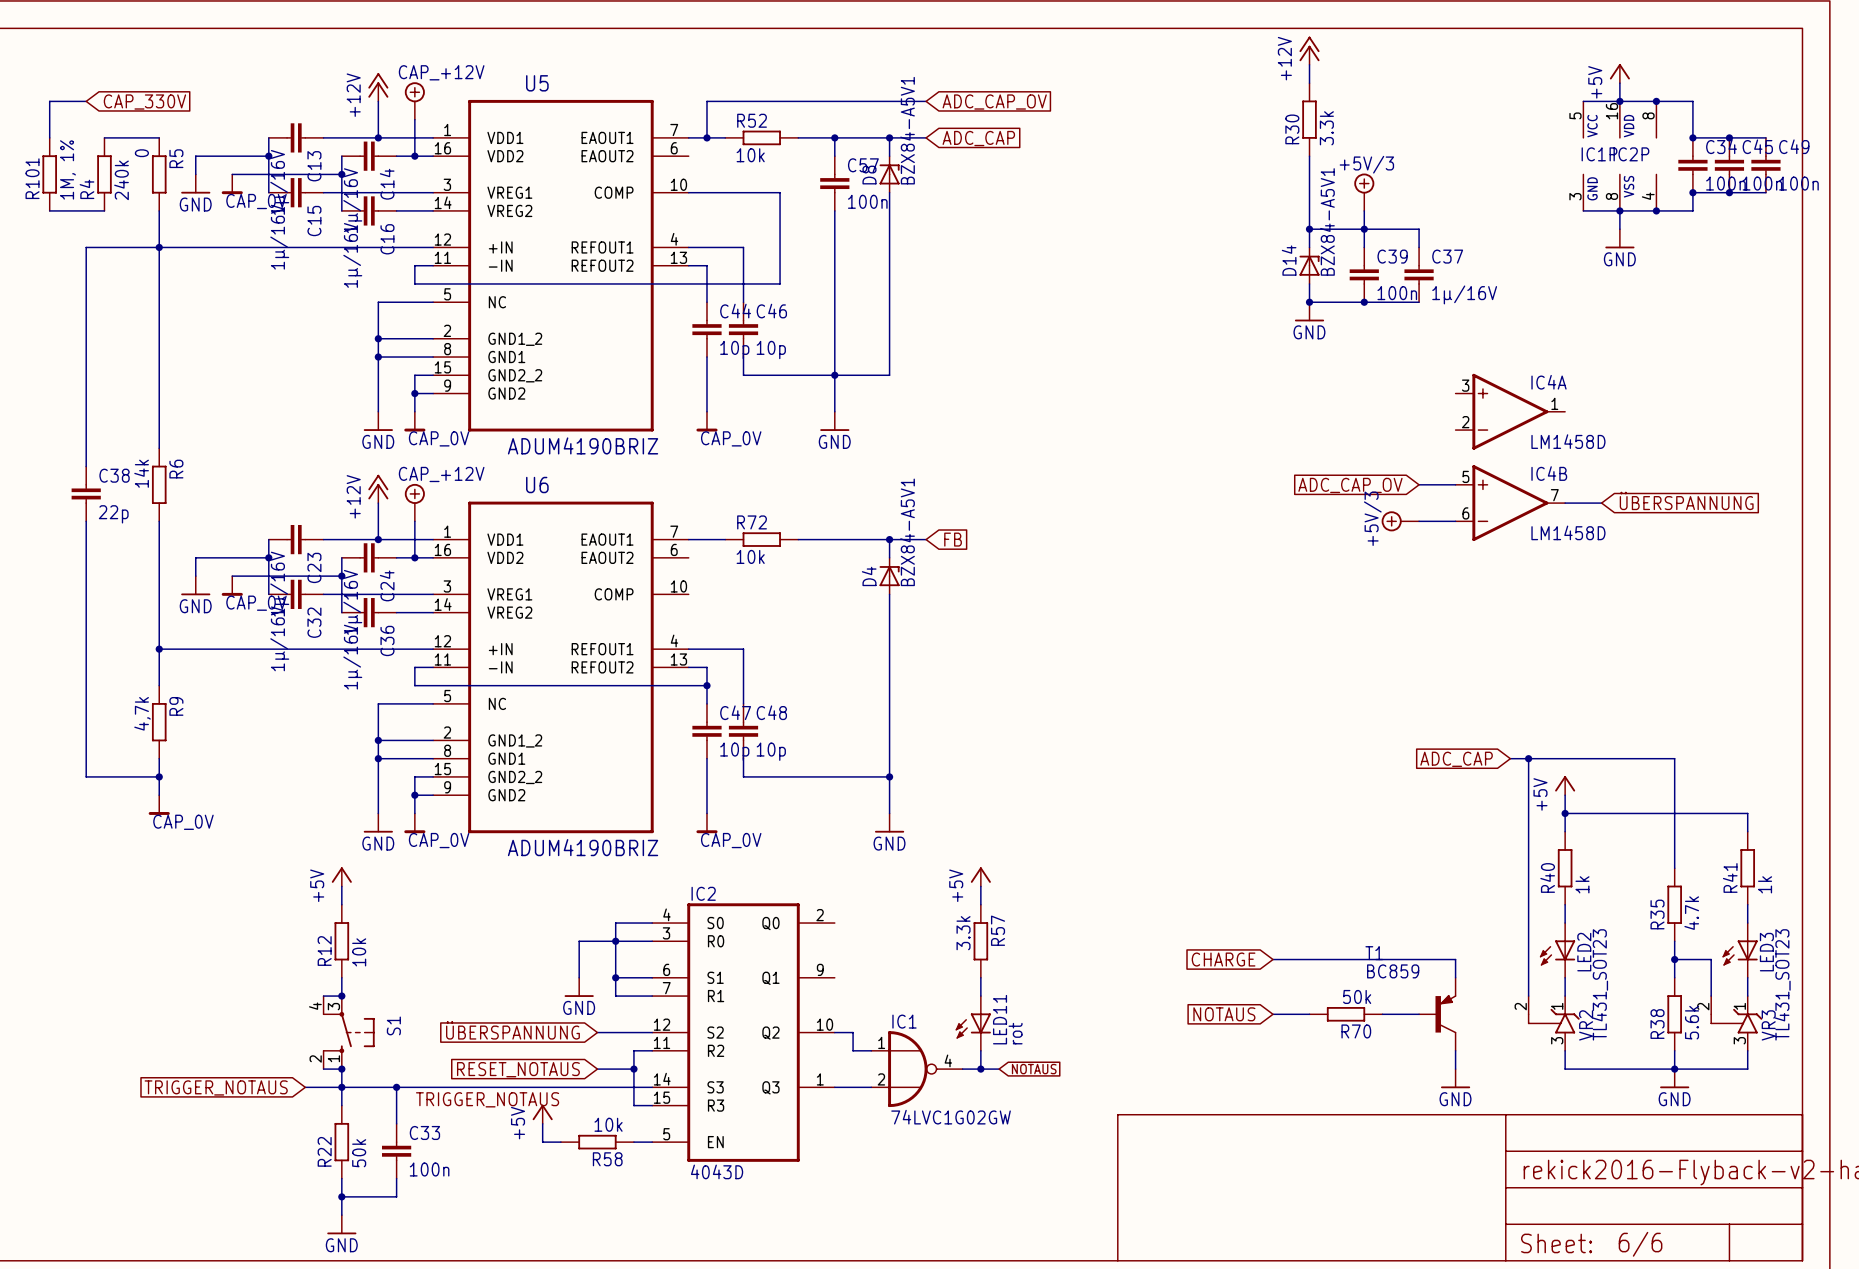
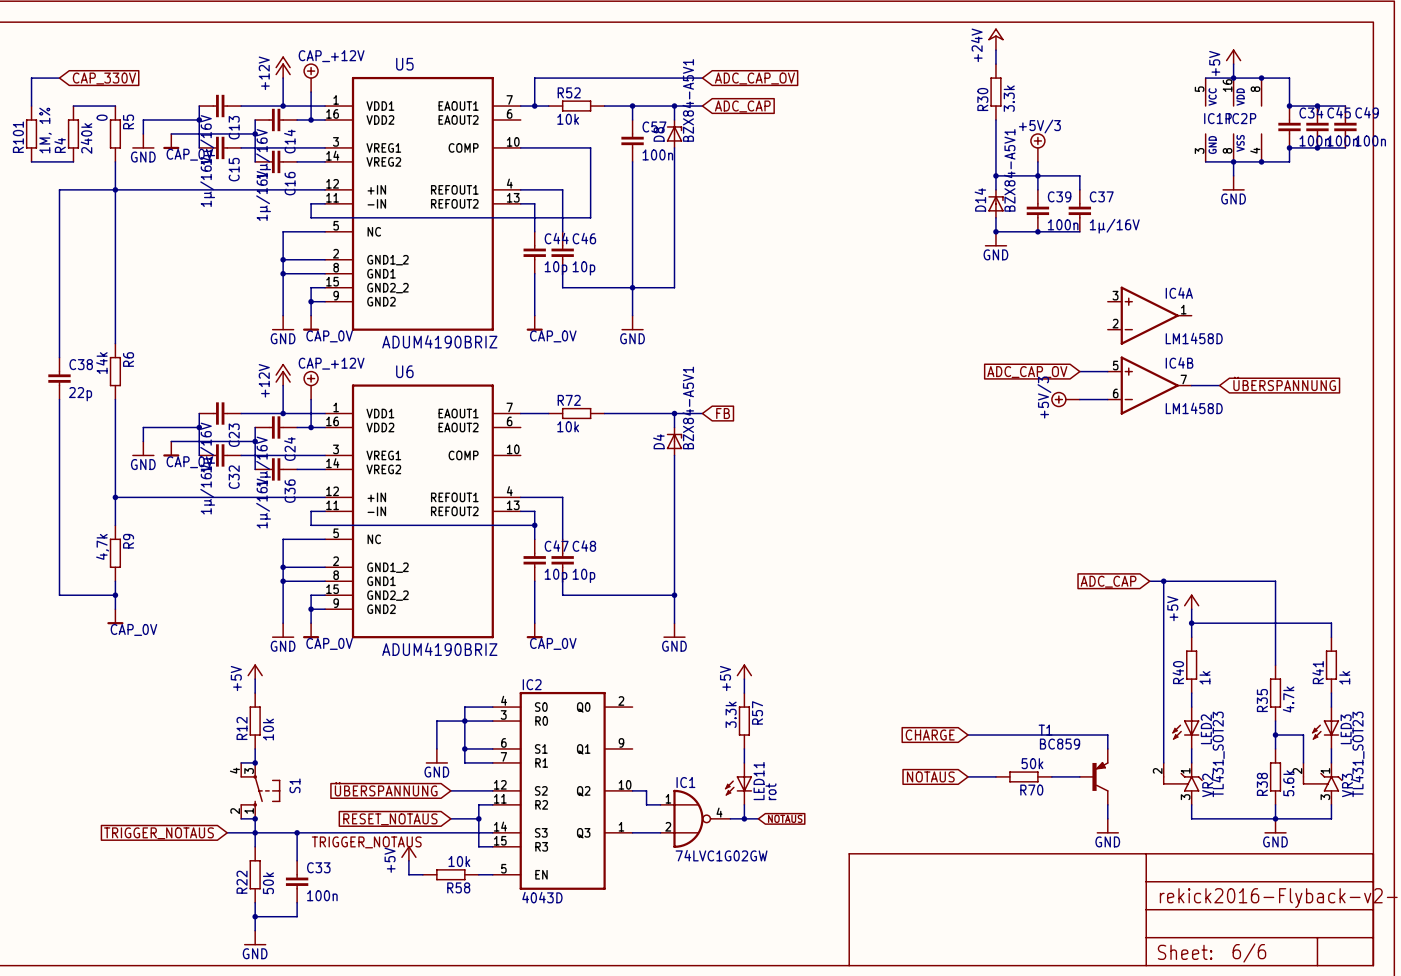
power symbol: +12V (1309, 50) -> +24V (995, 39)

